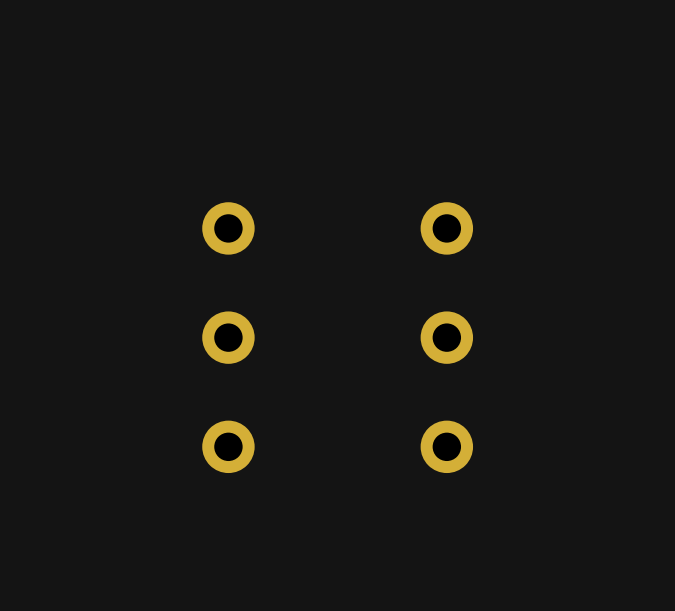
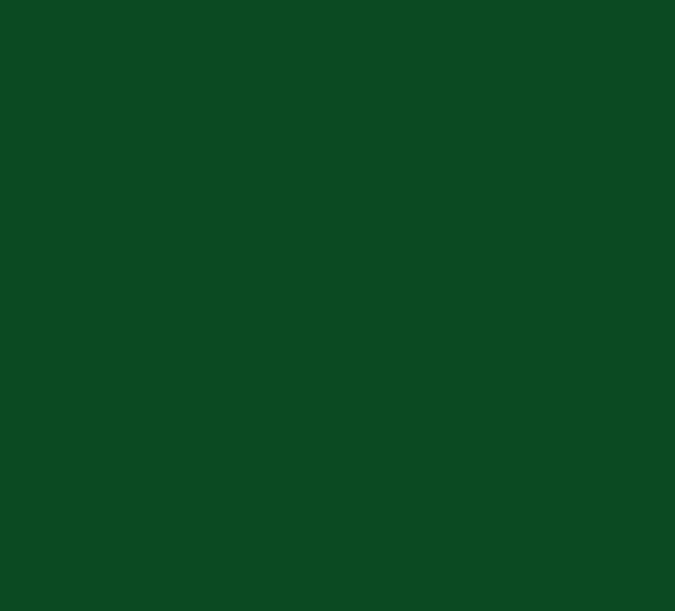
part: (228, 337) -> none
part: (446, 337) -> none

